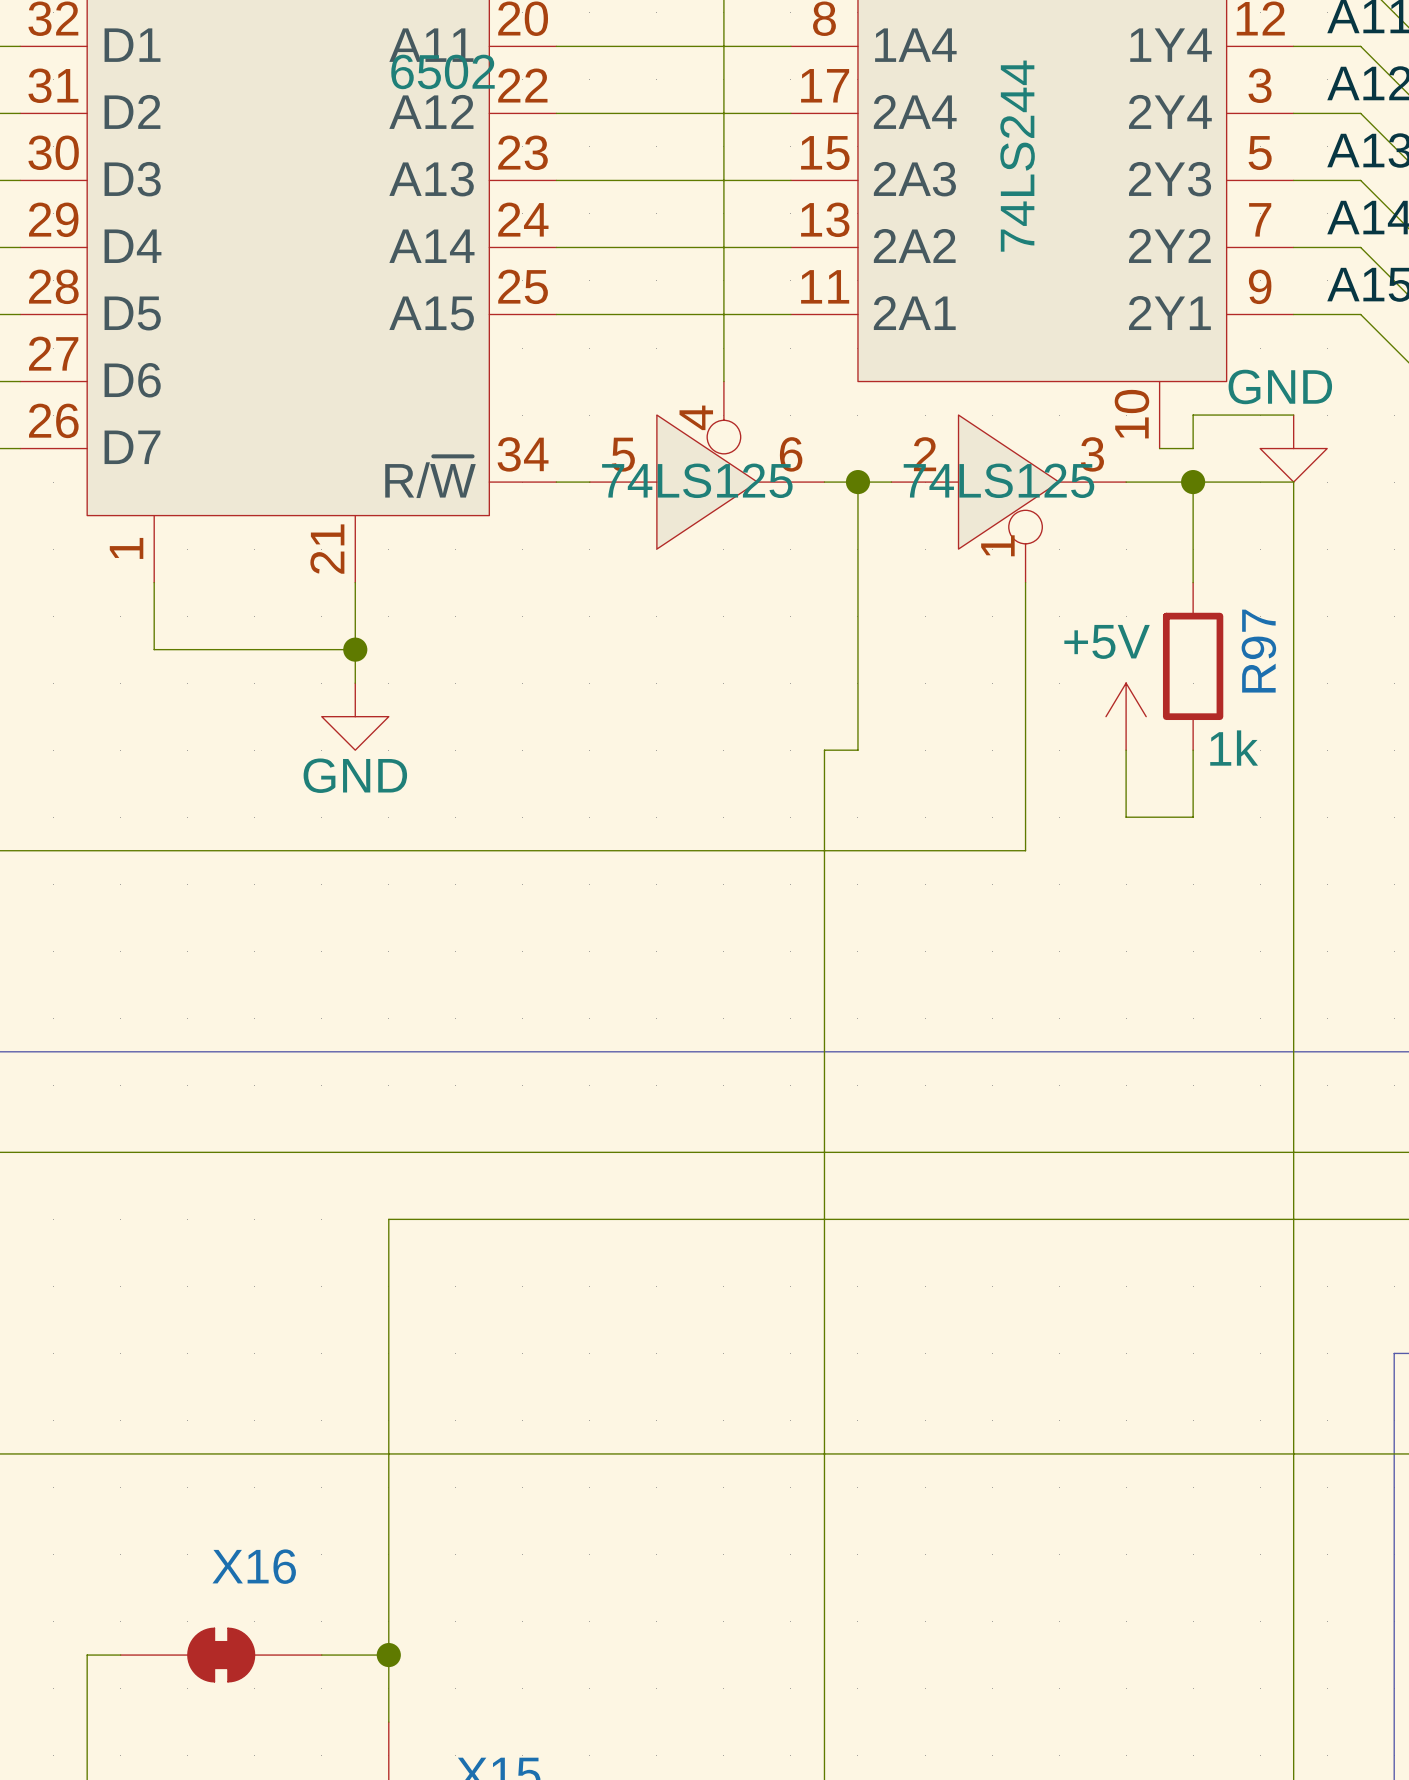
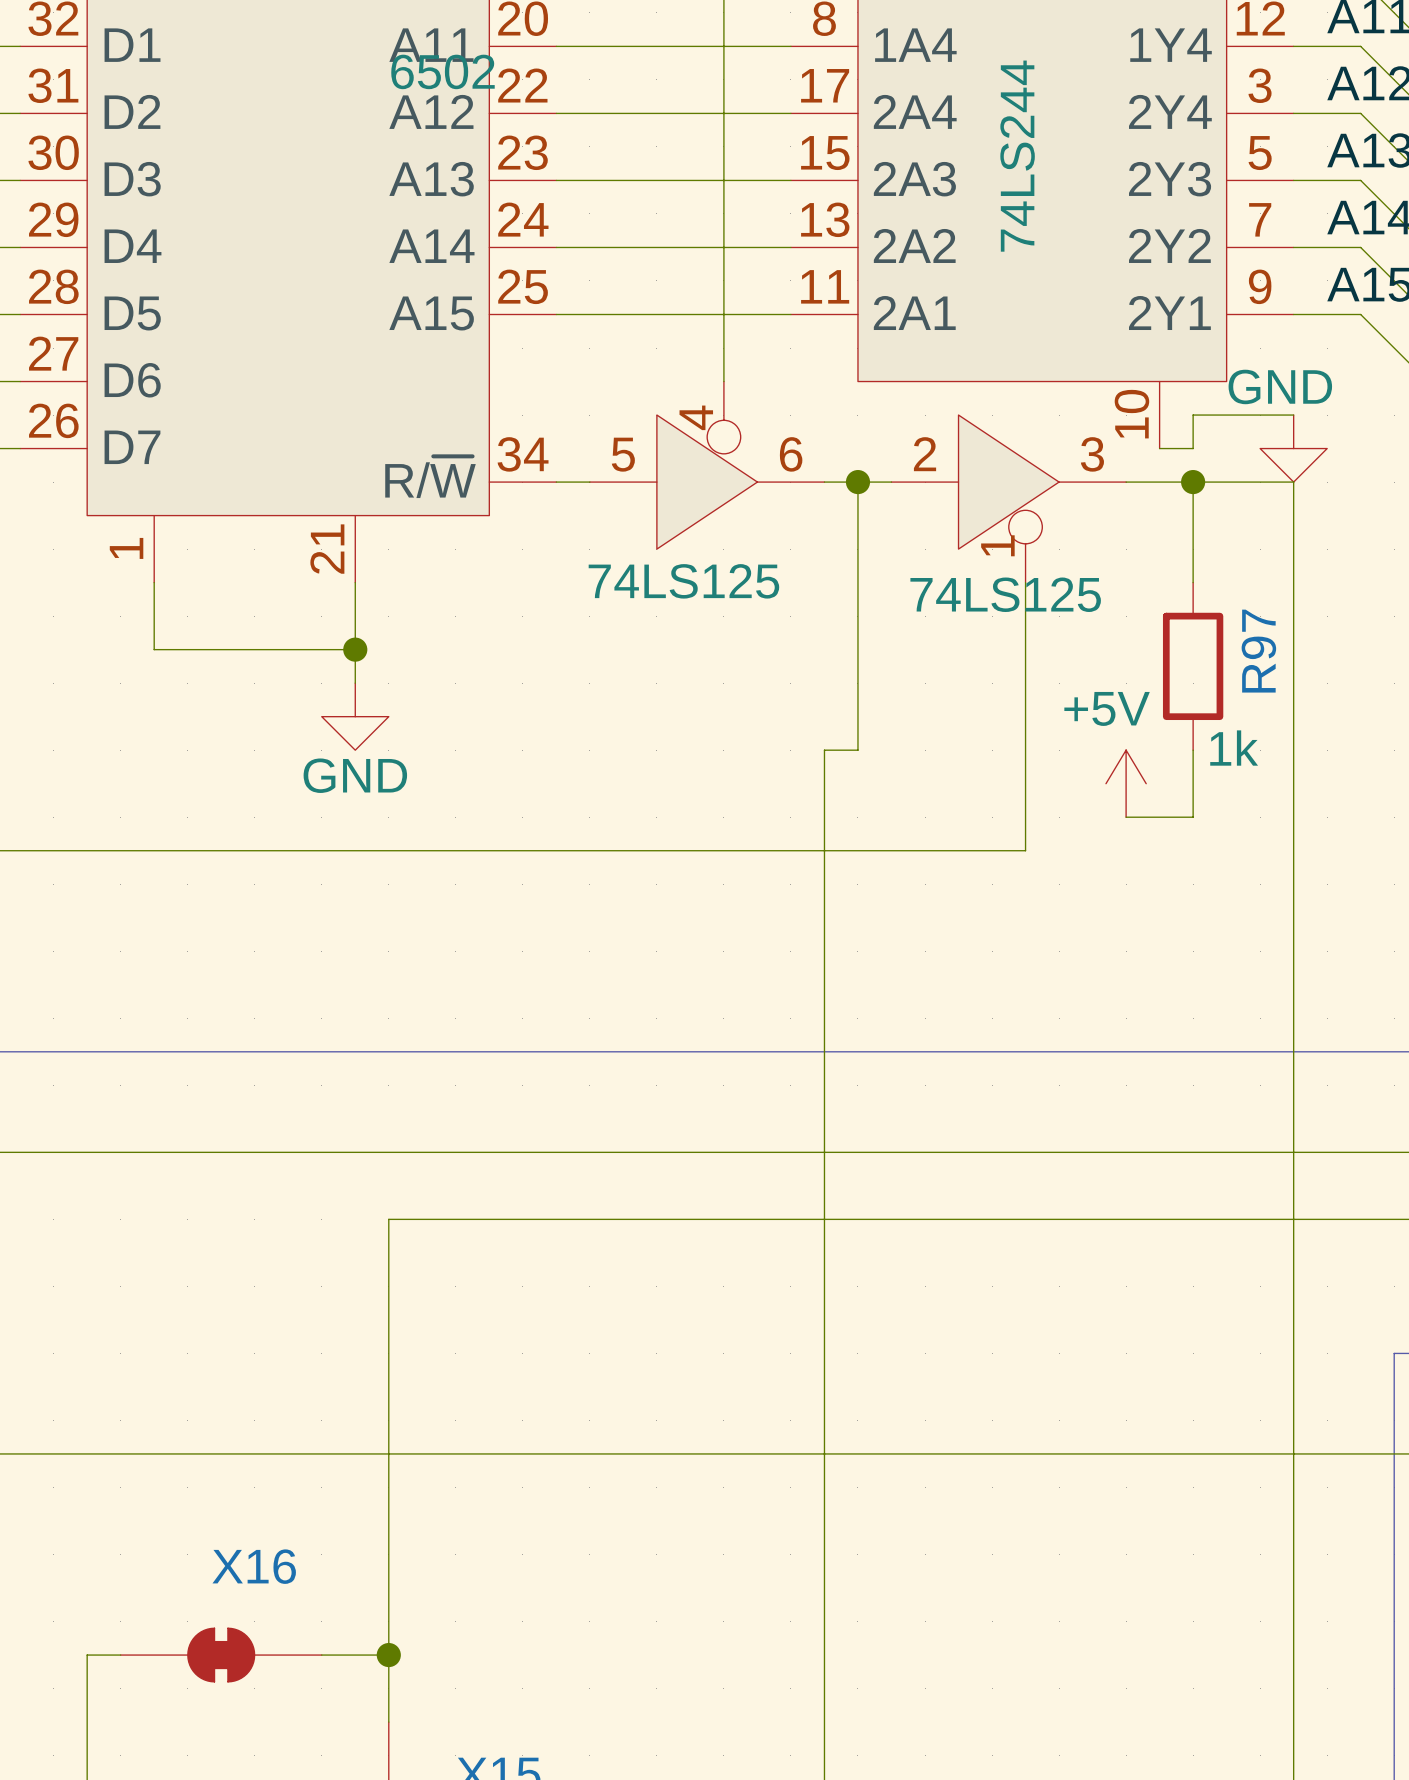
part value position: 74LS125 (697, 480) -> 74LS125 (683, 581)
part value position: 74LS125 (998, 480) -> 74LS125 (1005, 594)
power symbol position: +5V (1126, 716) -> +5V (1126, 783)

